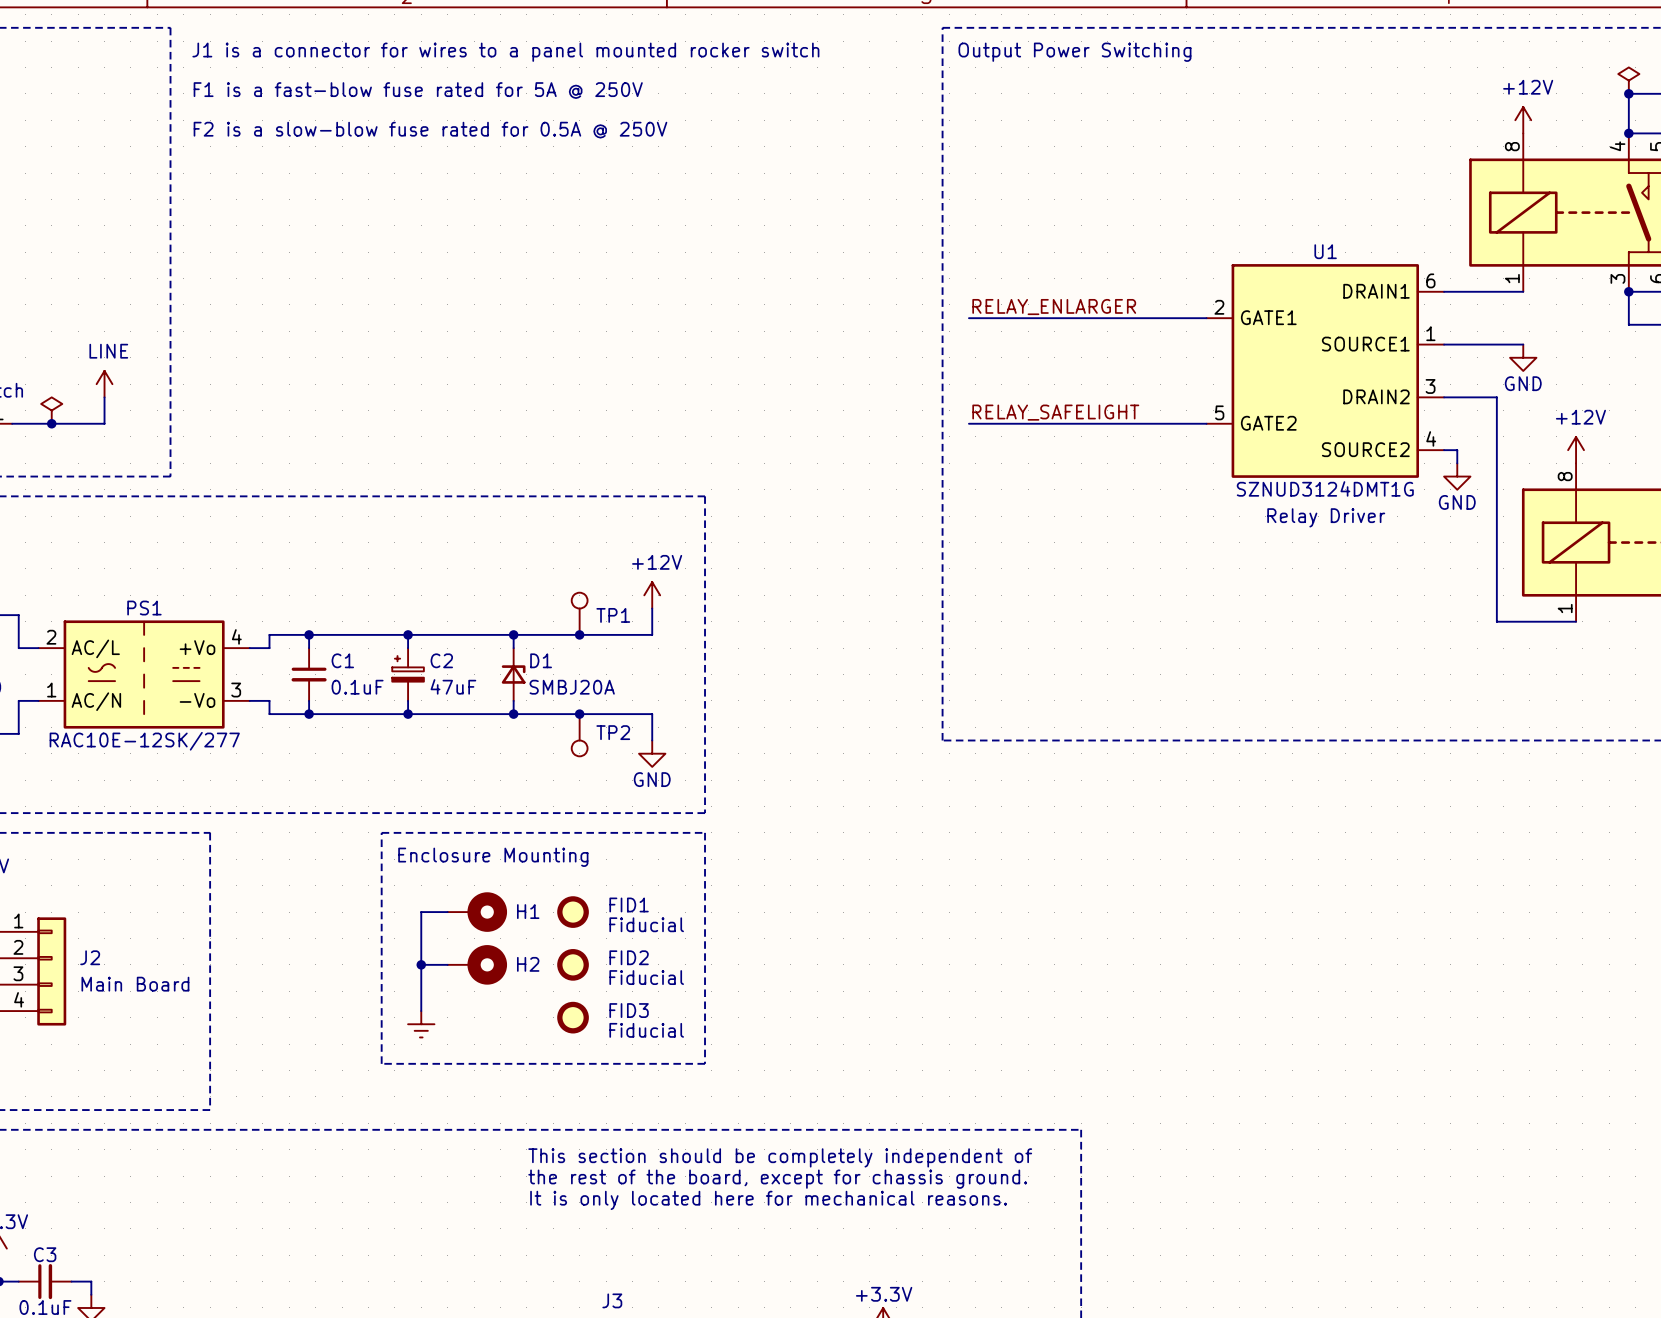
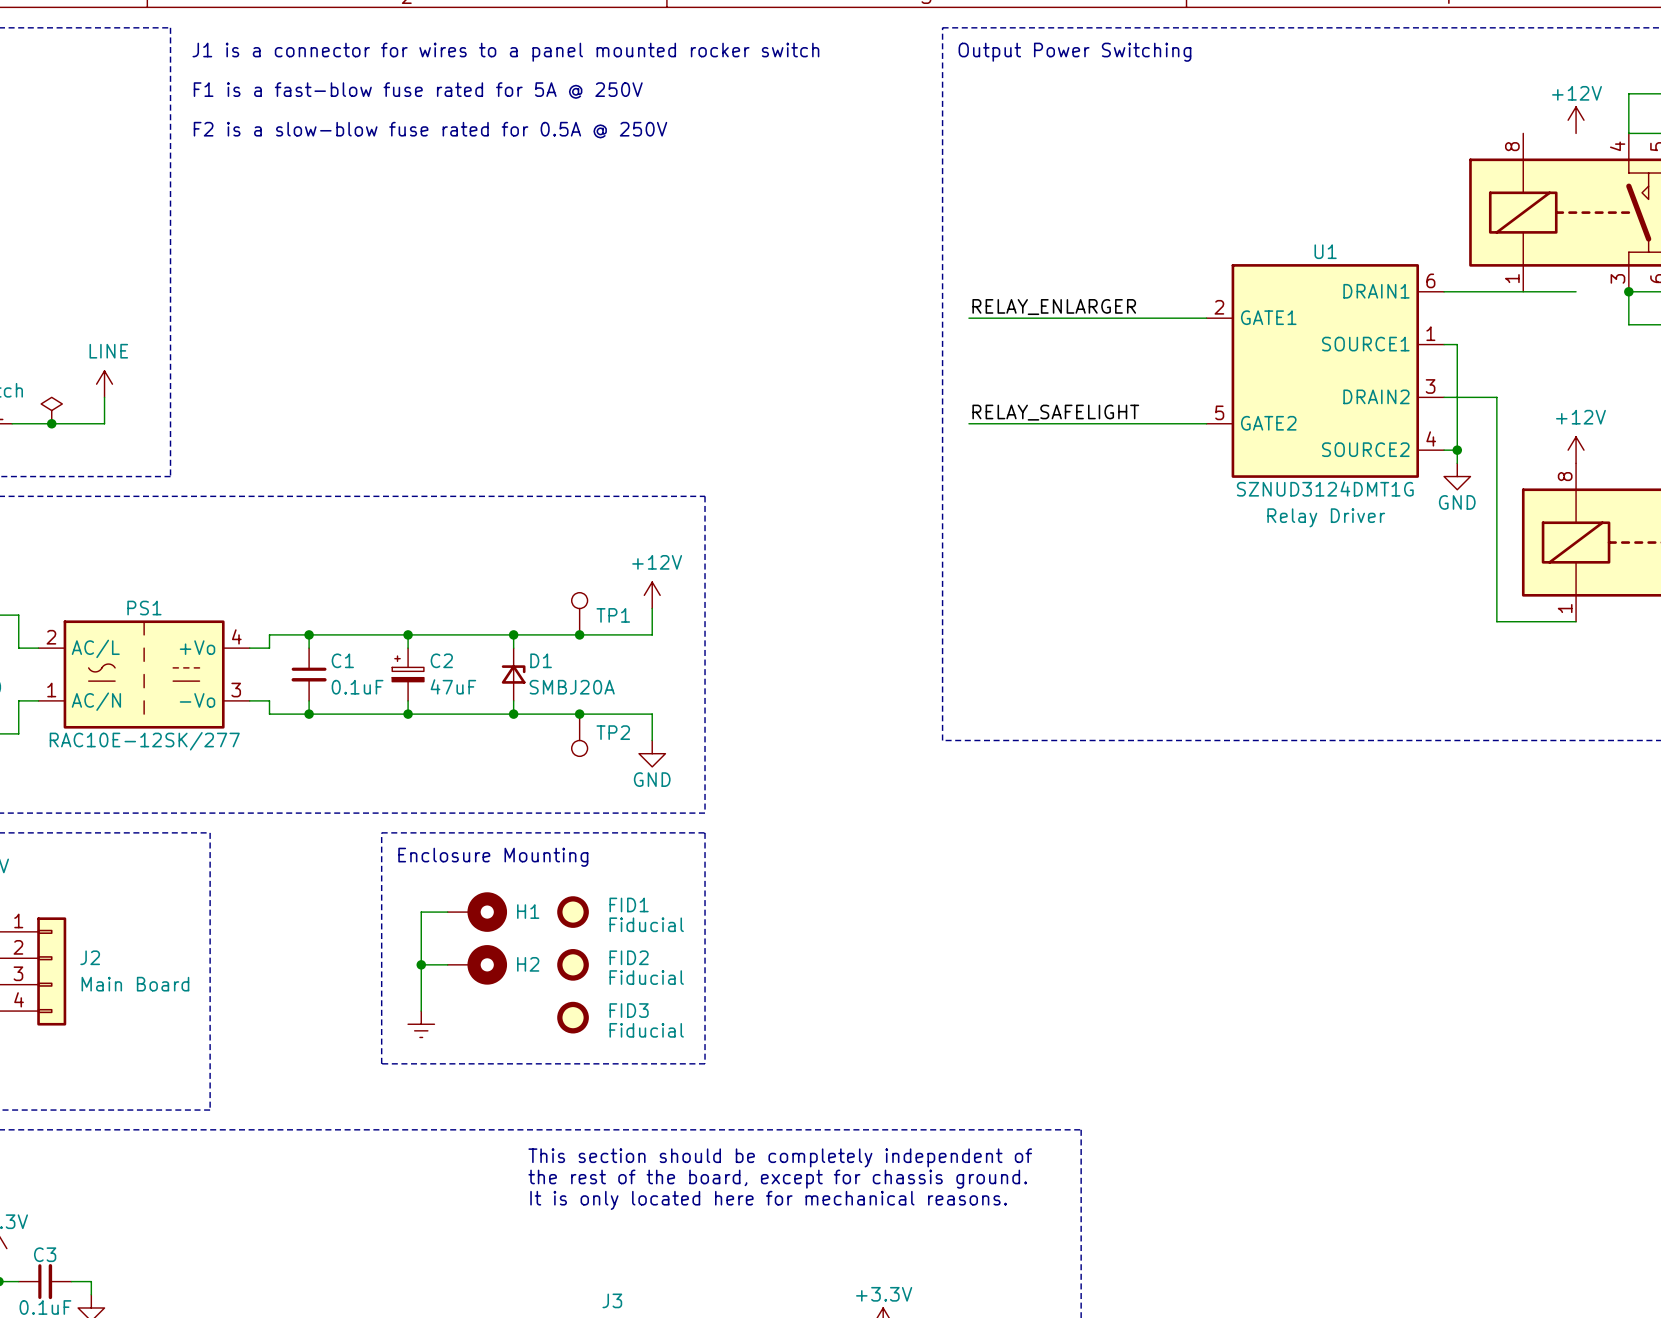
power symbol: (1628, 80) -> none
power symbol text position: +12V (1528, 87) -> +12V (1576, 93)
junction: (1628, 93) -> none
power symbol position: +12V (1523, 120) -> +12V (1576, 120)
junction: (1628, 133) -> none
wire: none -> (1523, 291) (1576, 291)
wire: (1457, 344) (1523, 344) -> (1457, 344) (1457, 450)
power symbol: GND (1523, 357) -> none
junction: none -> (1457, 450)

